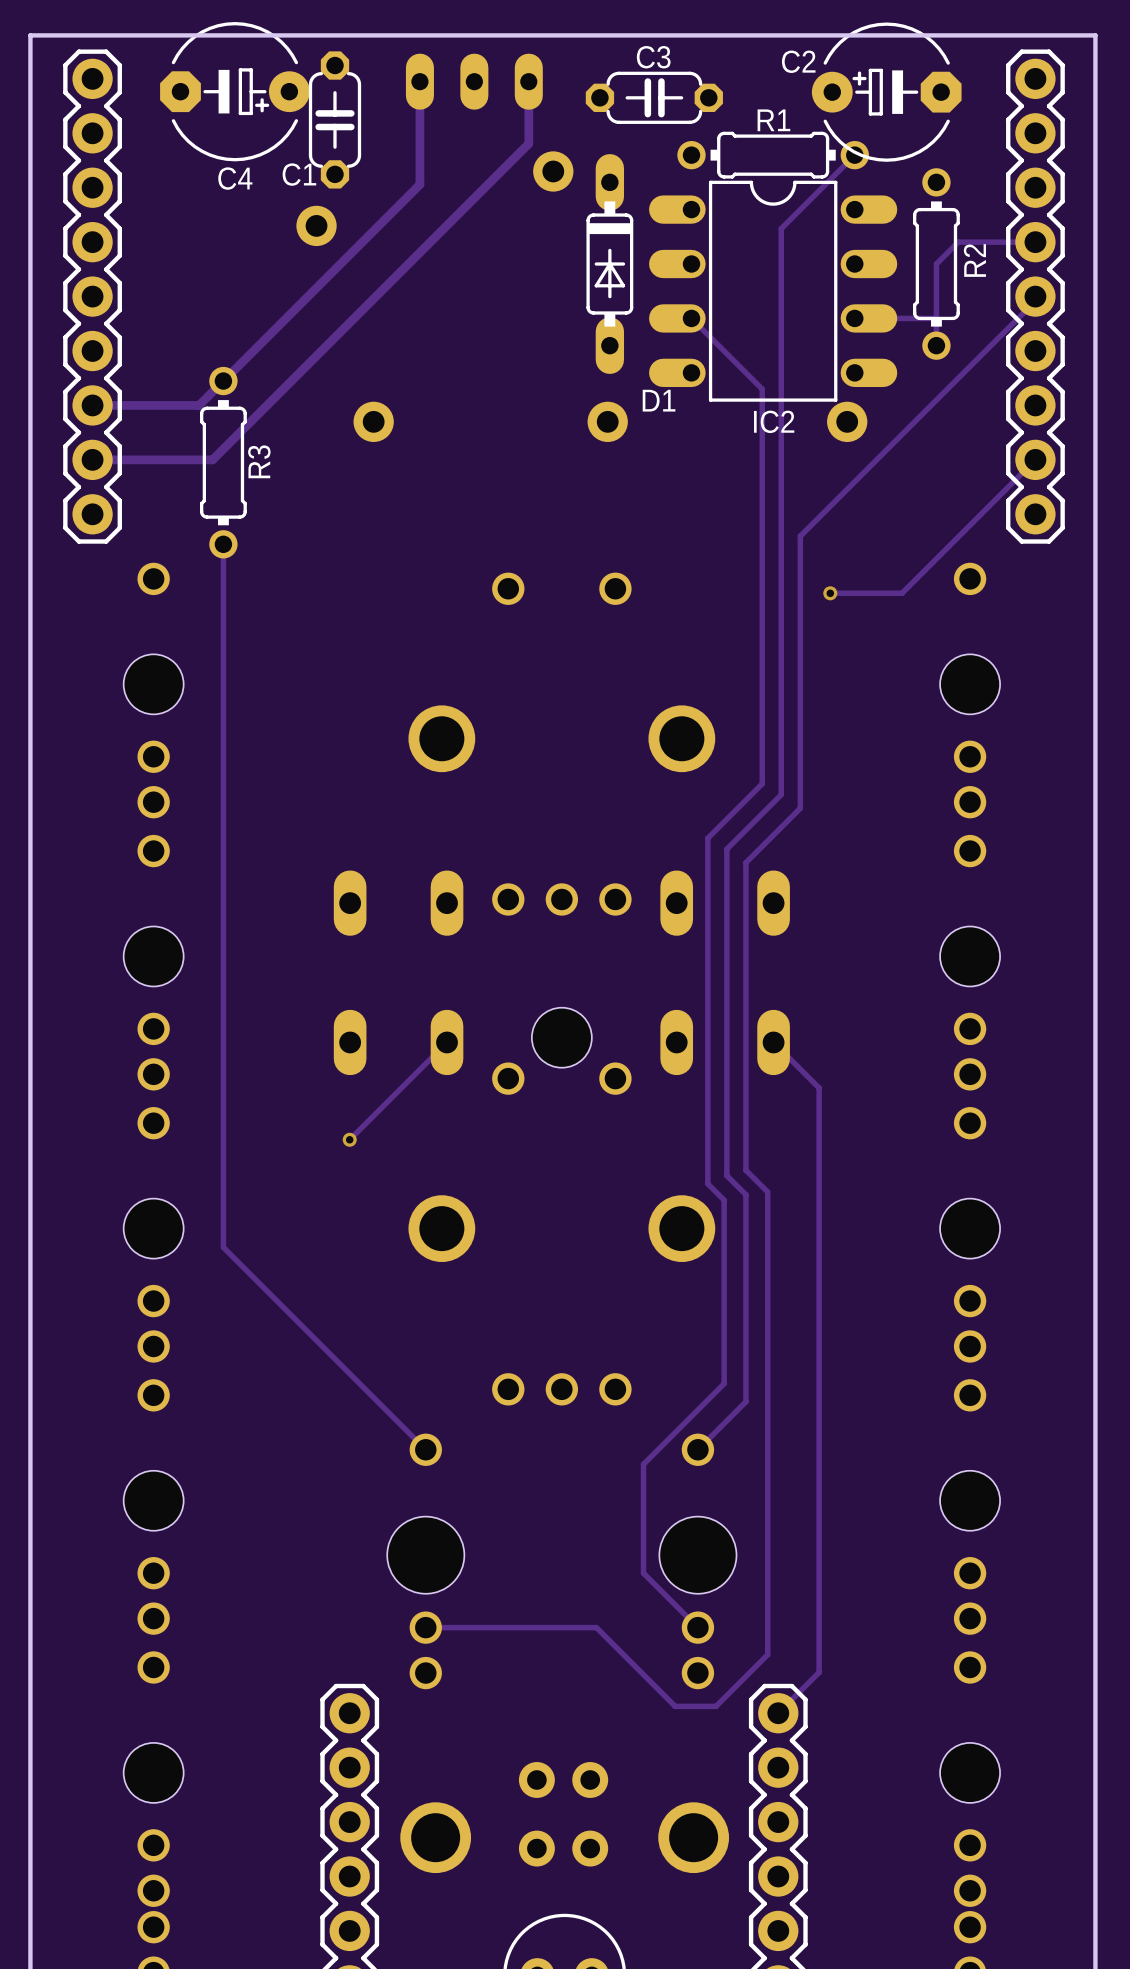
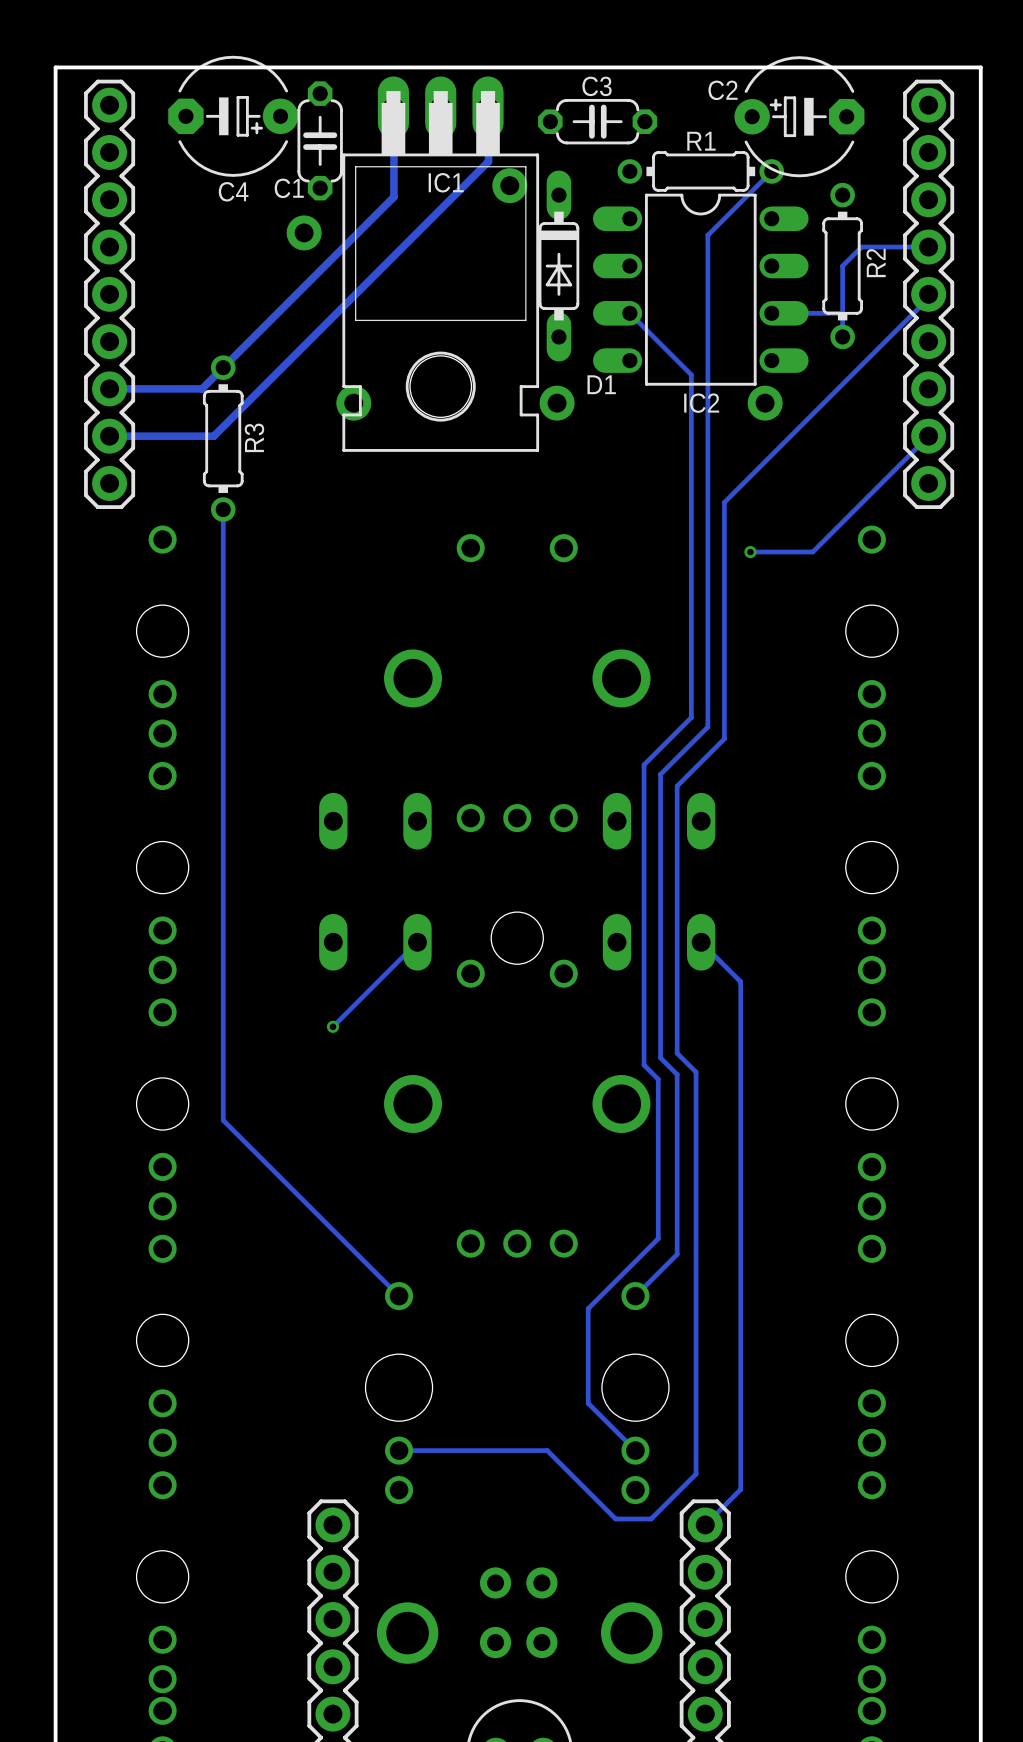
part: (474, 81) -> none
IC1: none -> (440, 264)

